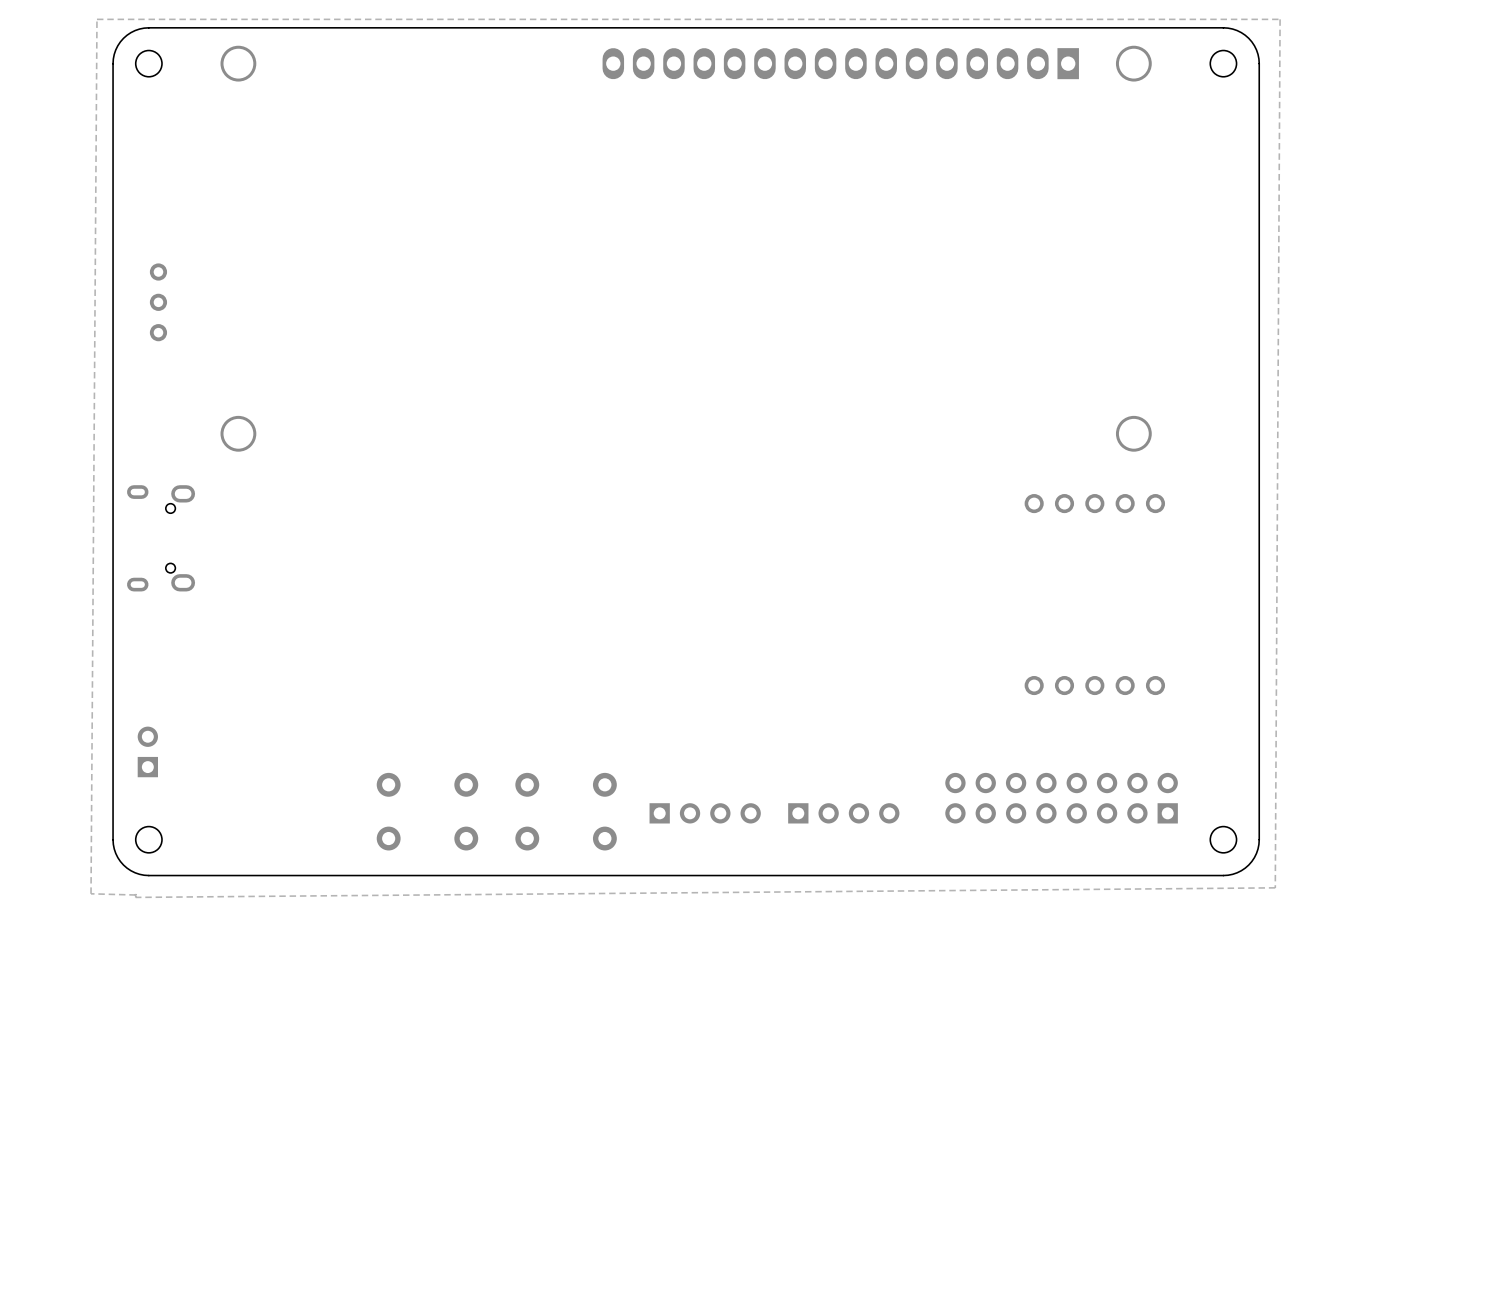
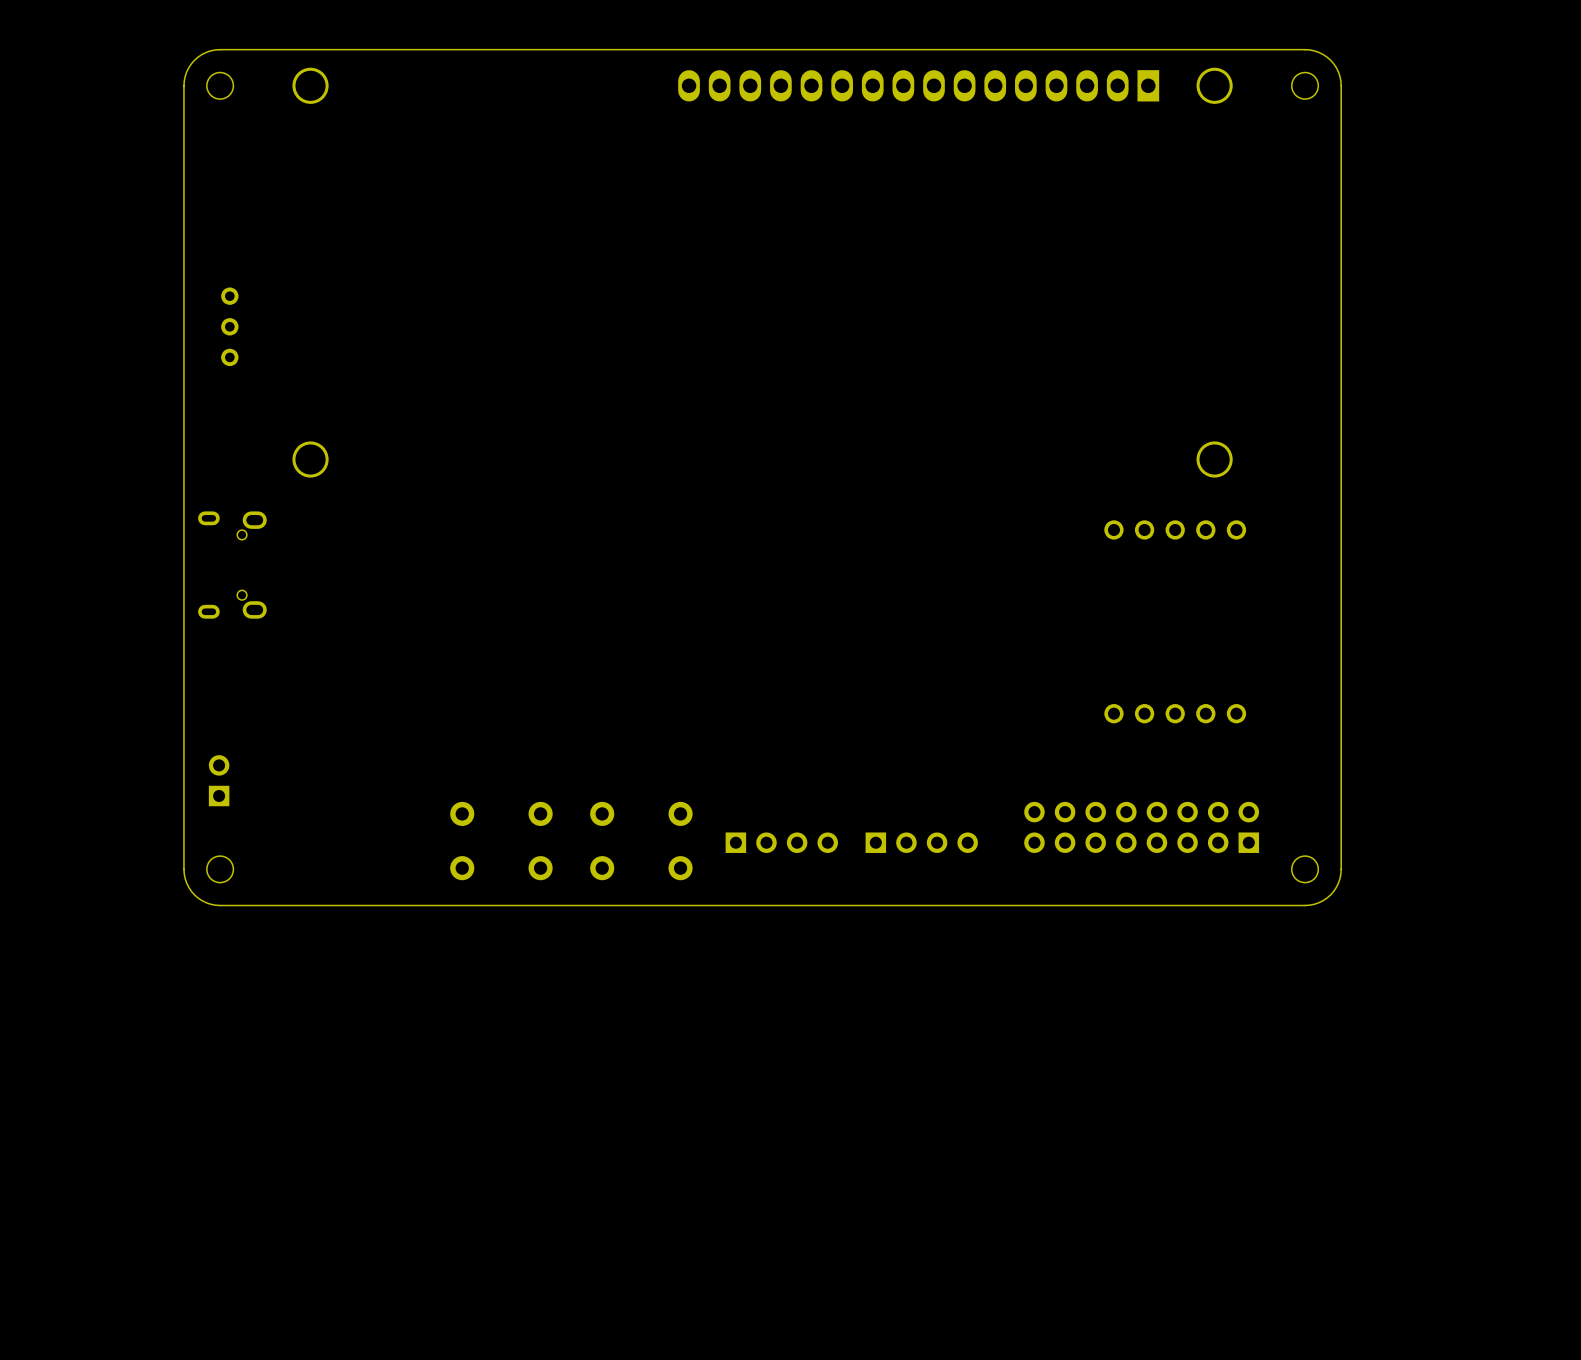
zone outline: (135, 893) (135, 897) (1275, 887) (1280, 19) (96, 19) (91, 893) (135, 895) -> none

